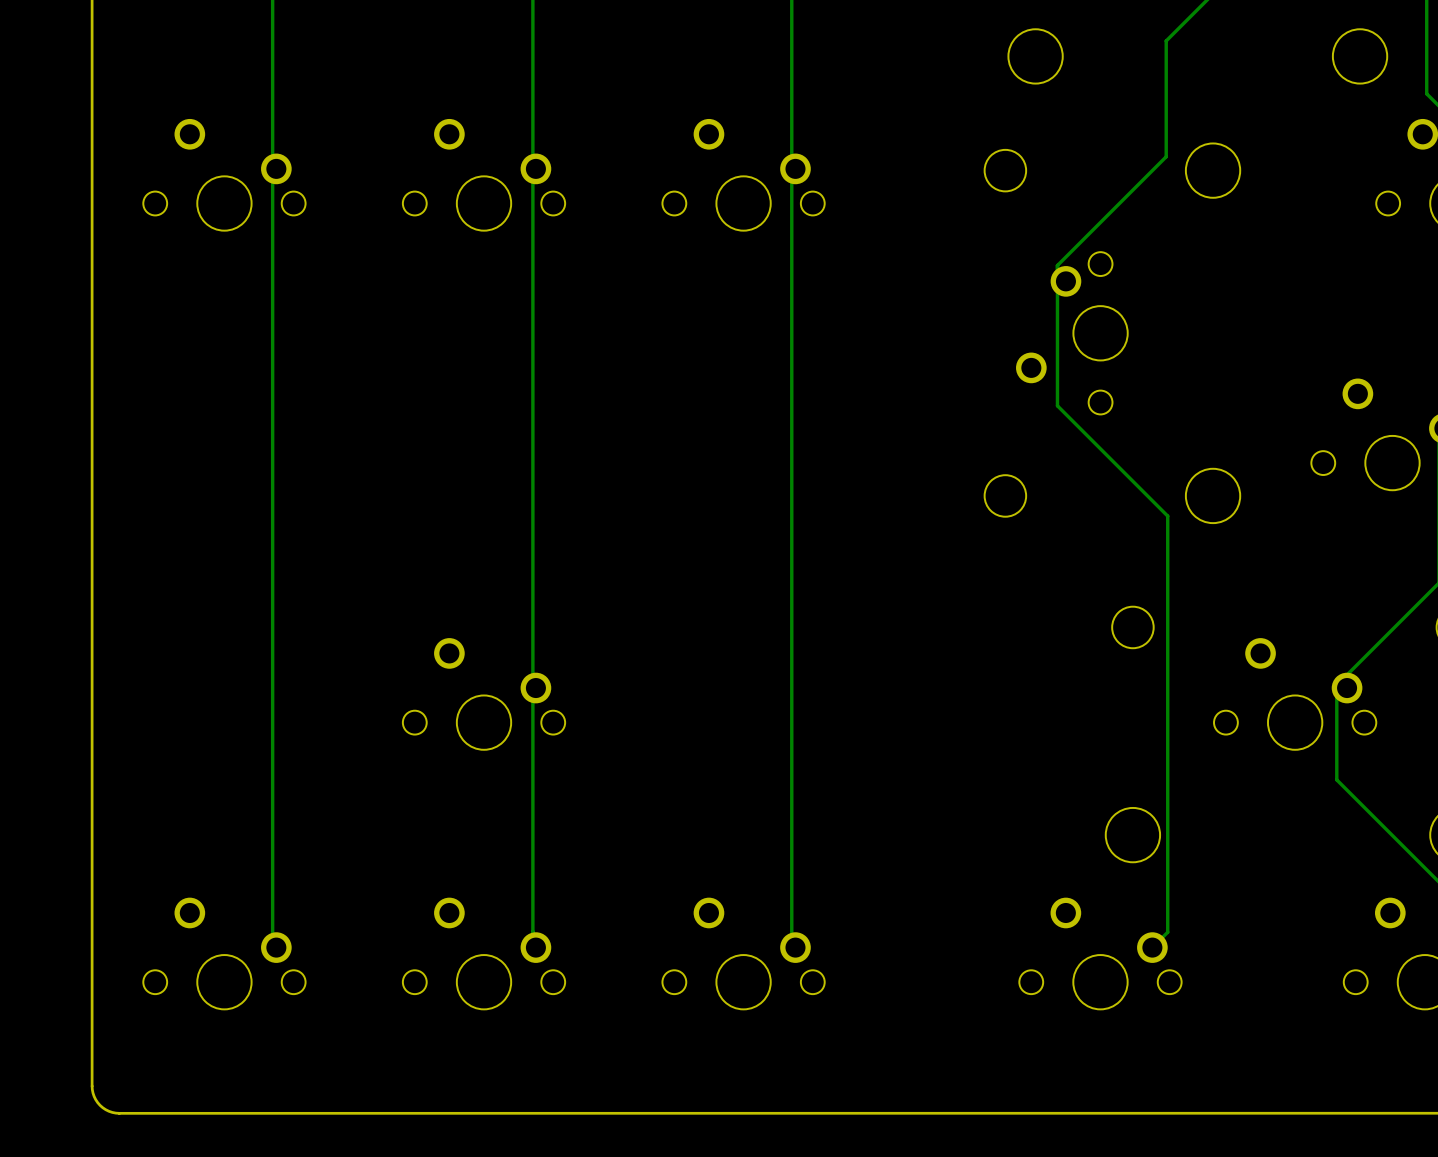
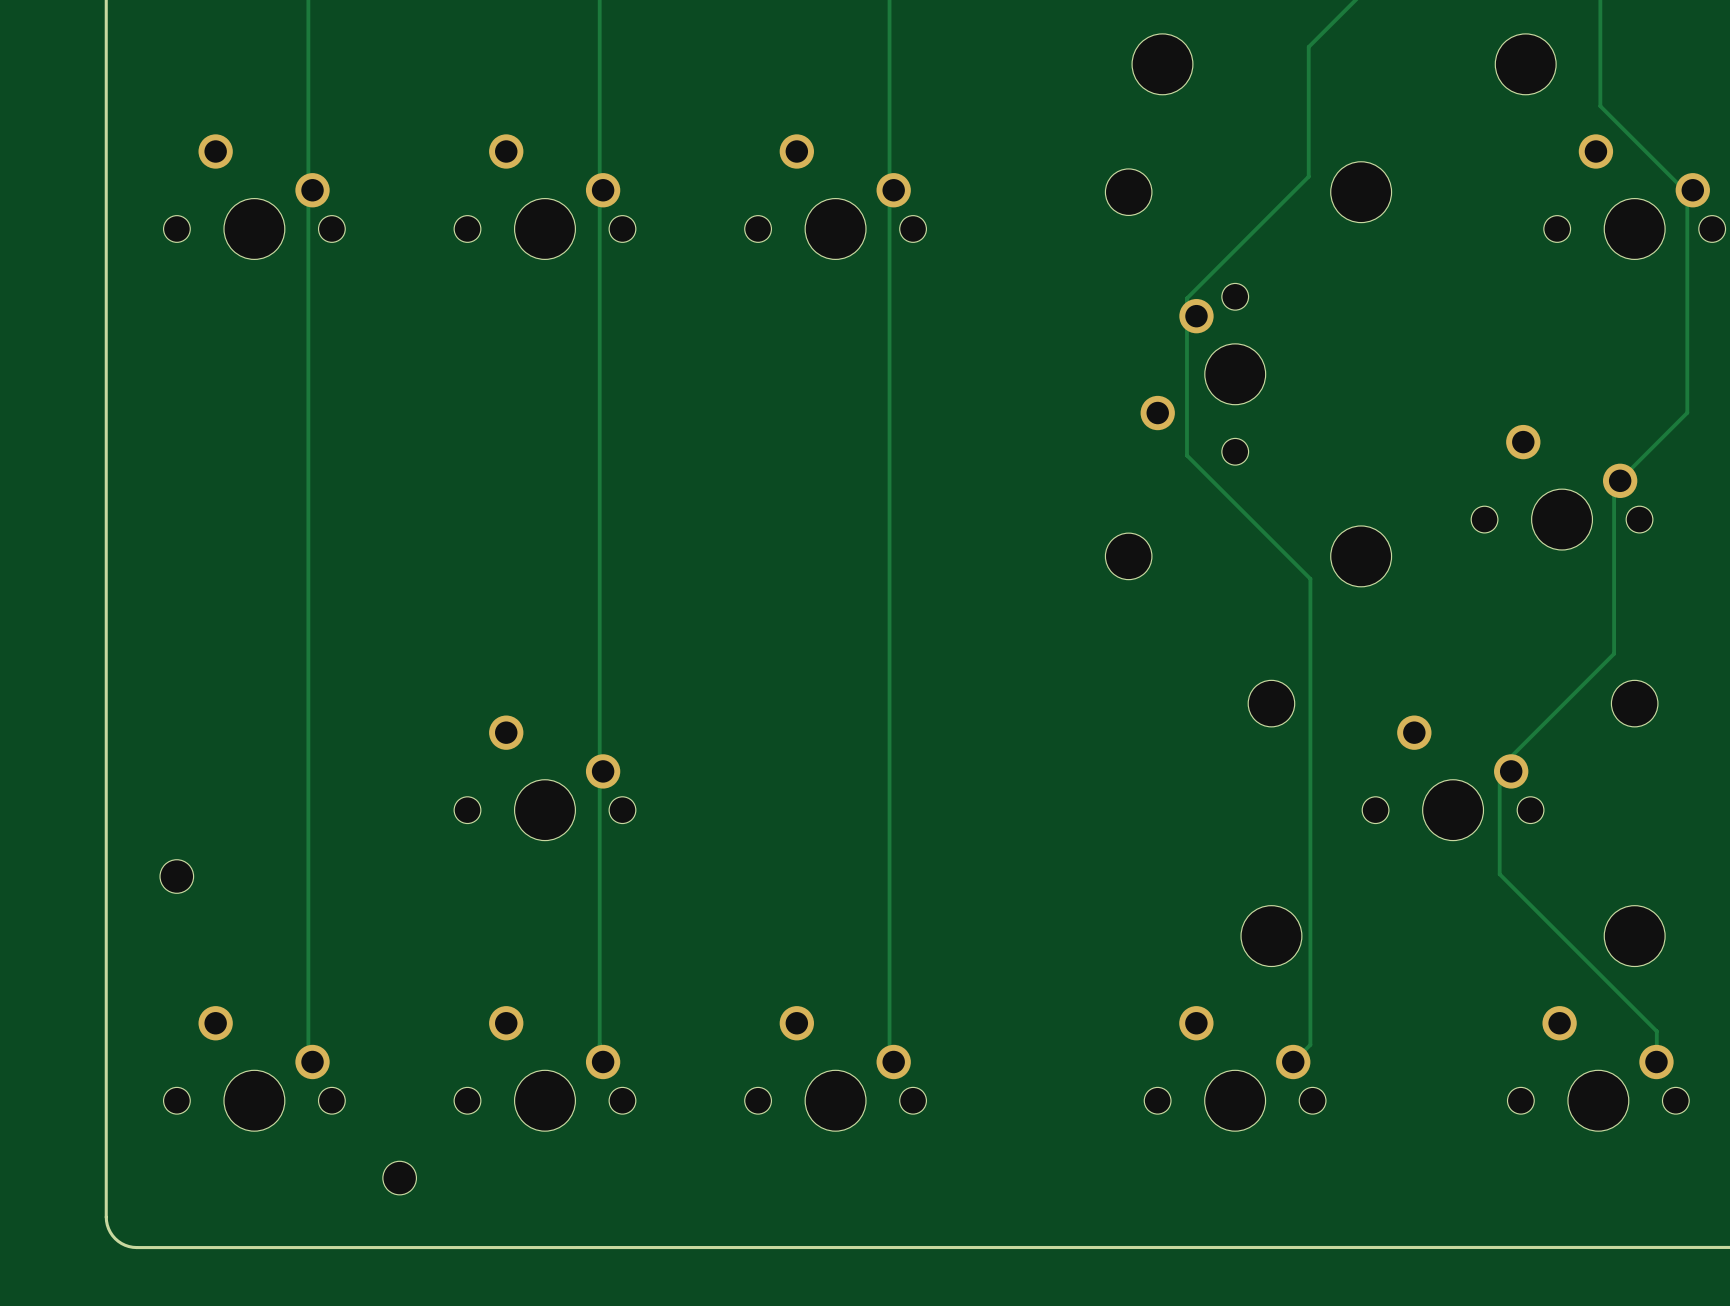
part: none -> (176, 876)
part: none -> (399, 1178)

